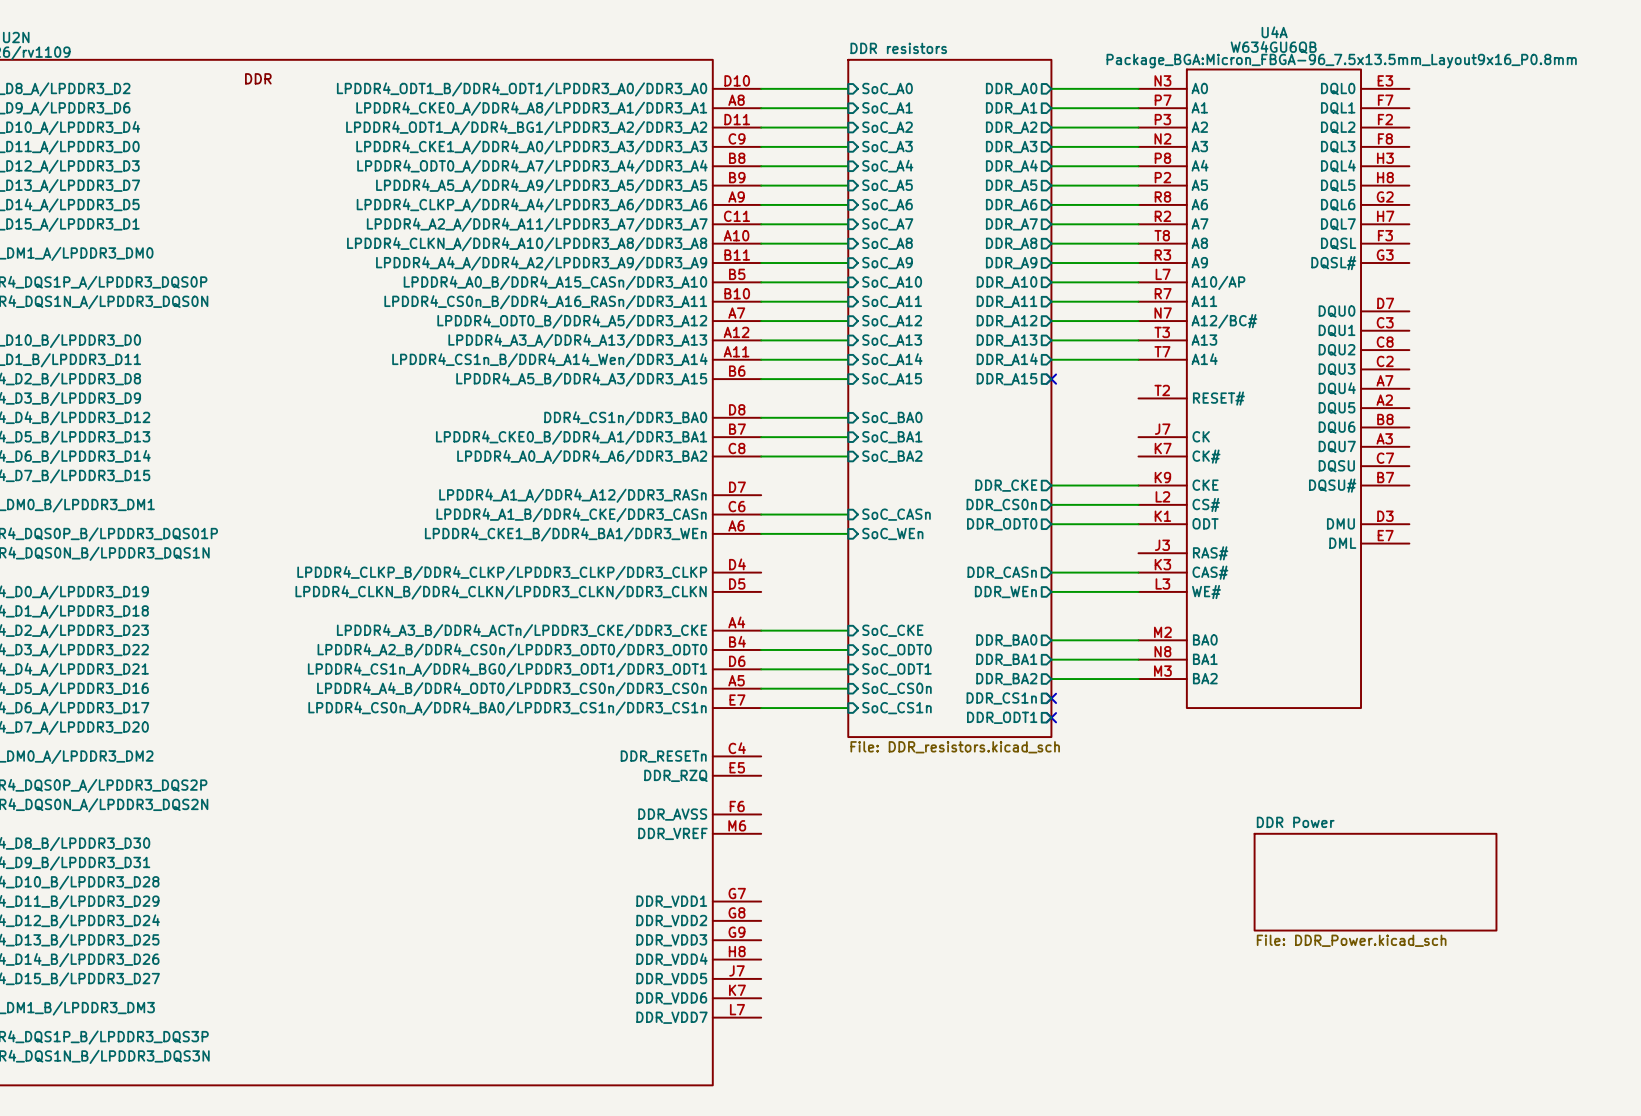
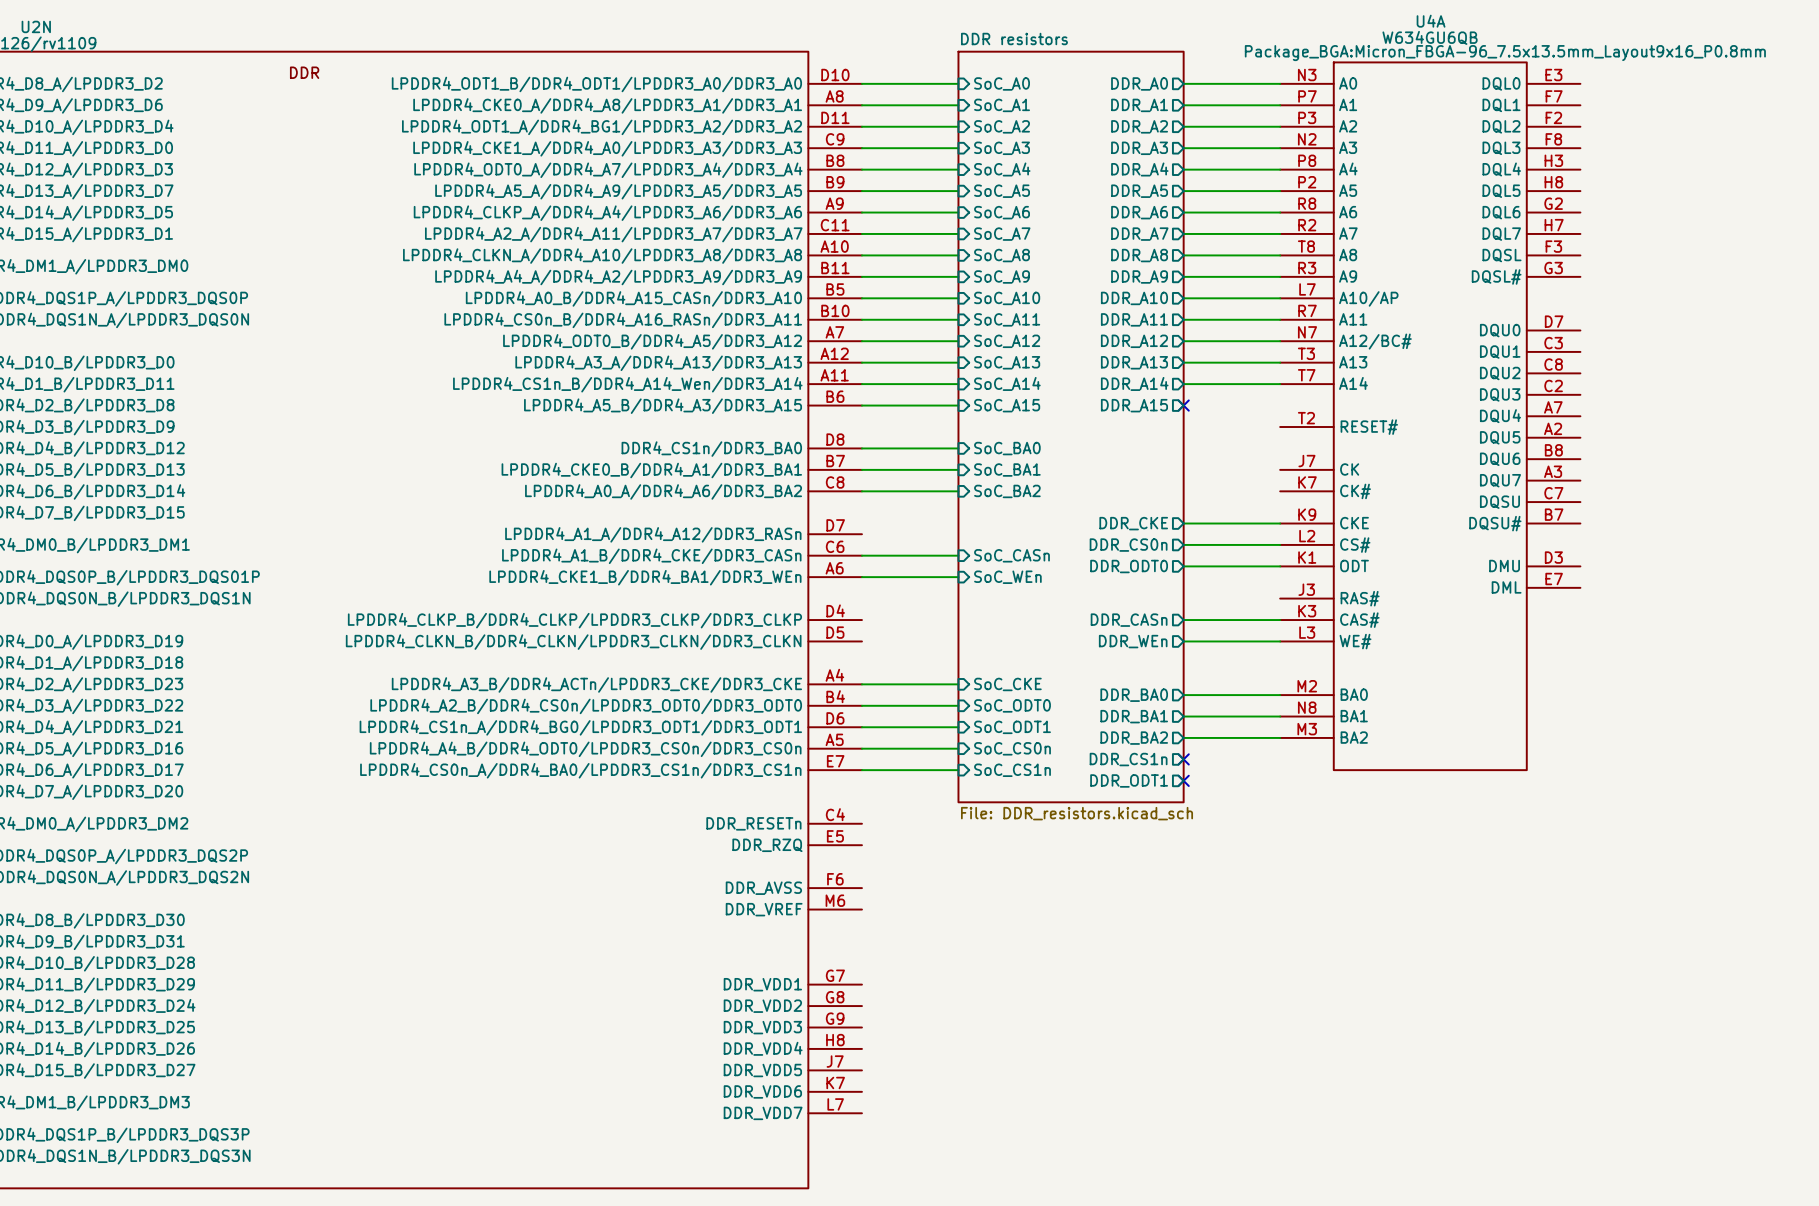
sheet DDR Power: File: DDR_Power.kicad_sch (1375, 882) -> none

